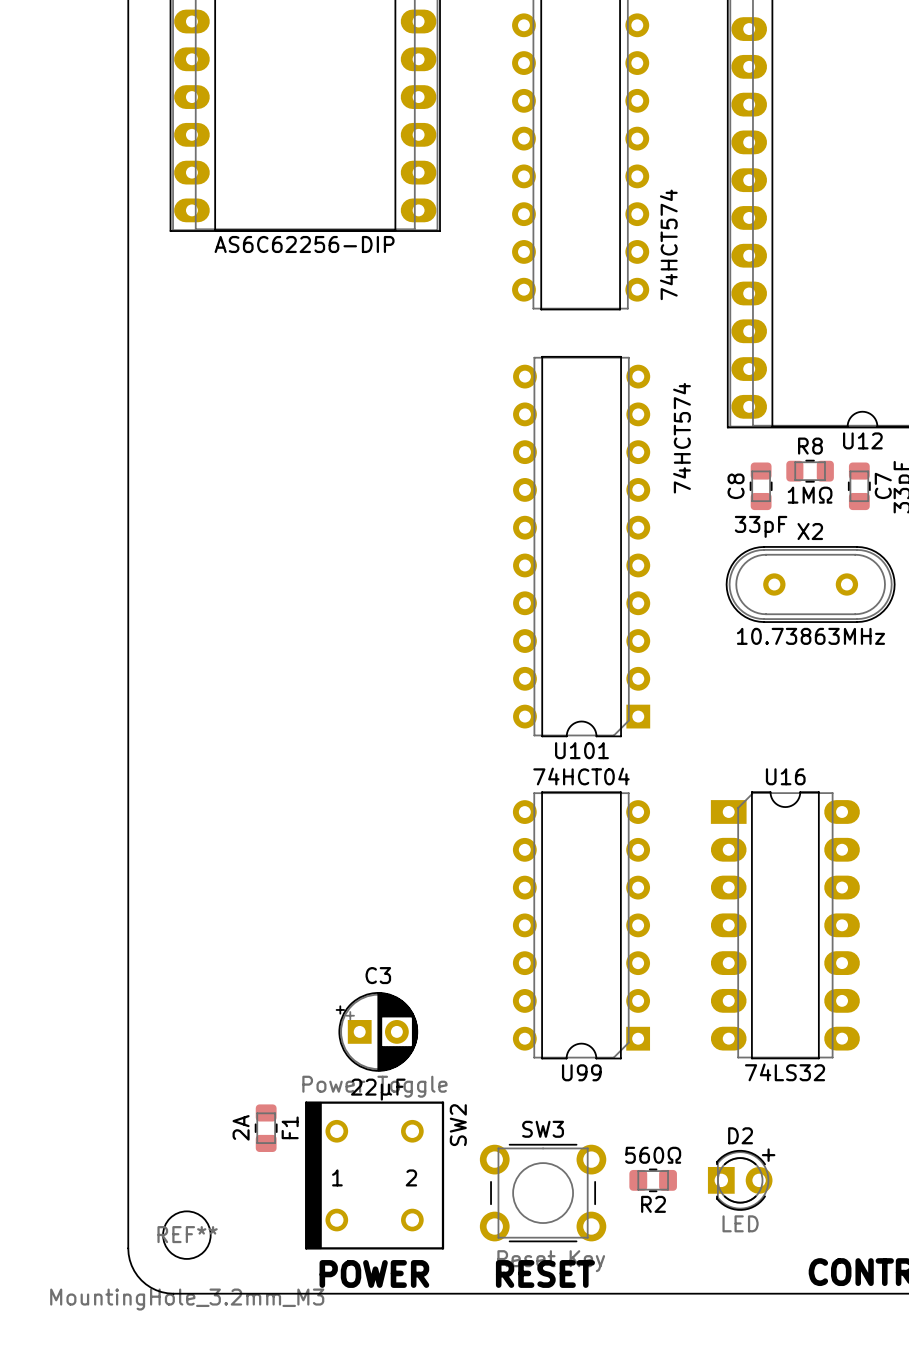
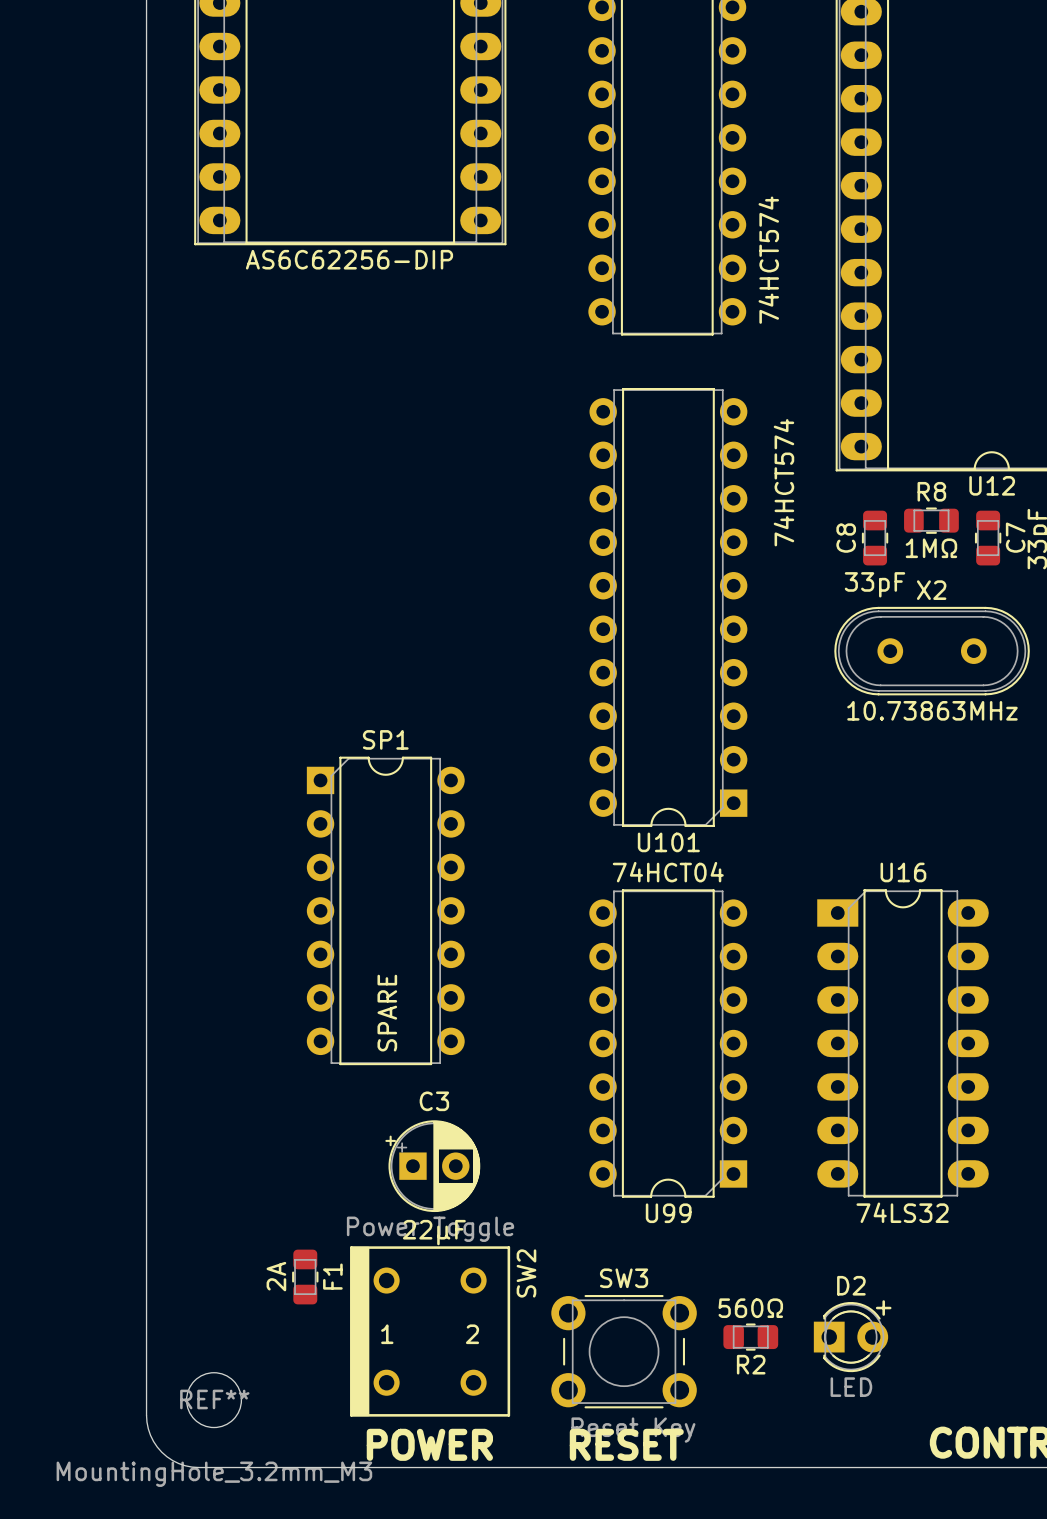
SP1: none -> (385, 910)
text: none -> SPARE (387, 1013)

